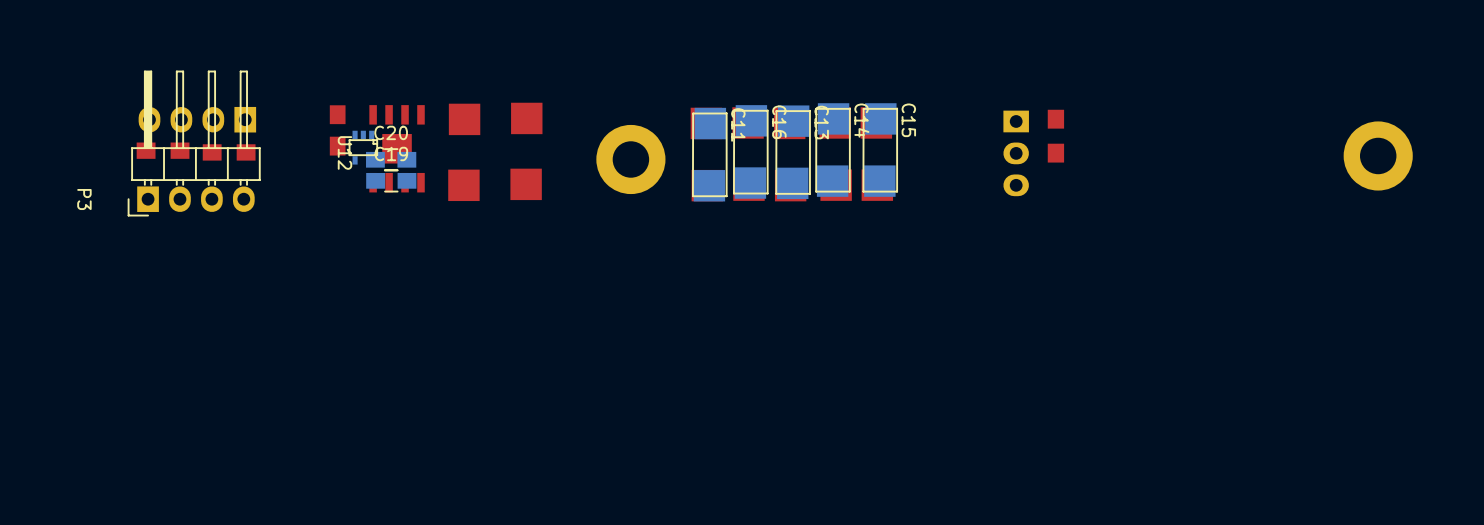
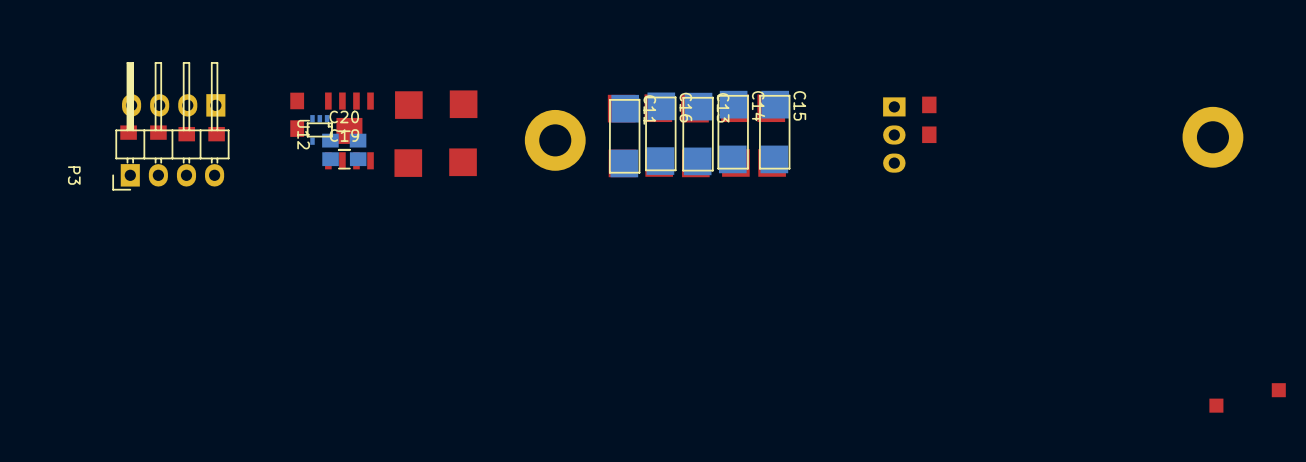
part: none -> (1278, 390)
part: none -> (1216, 405)

